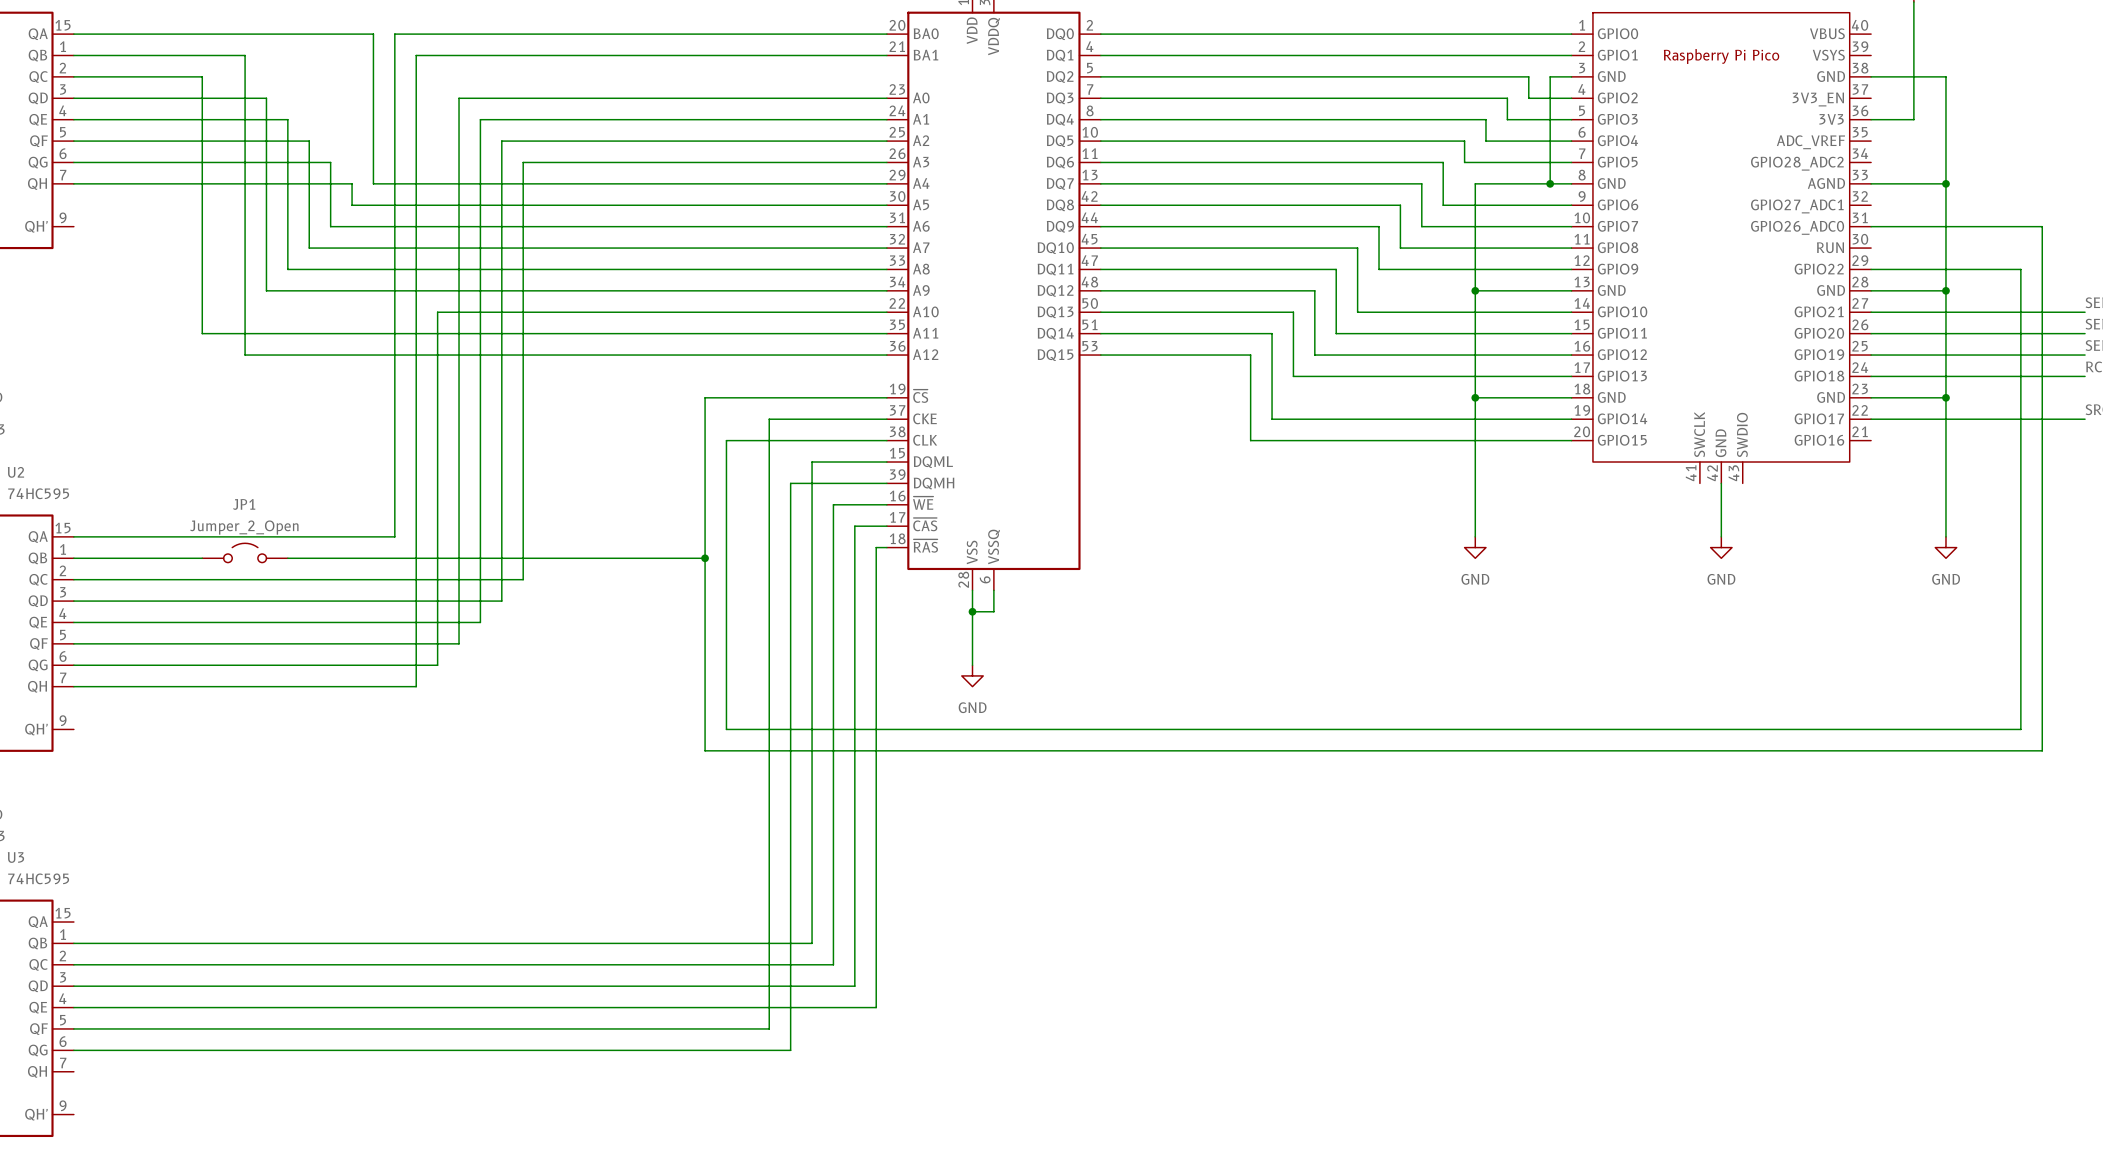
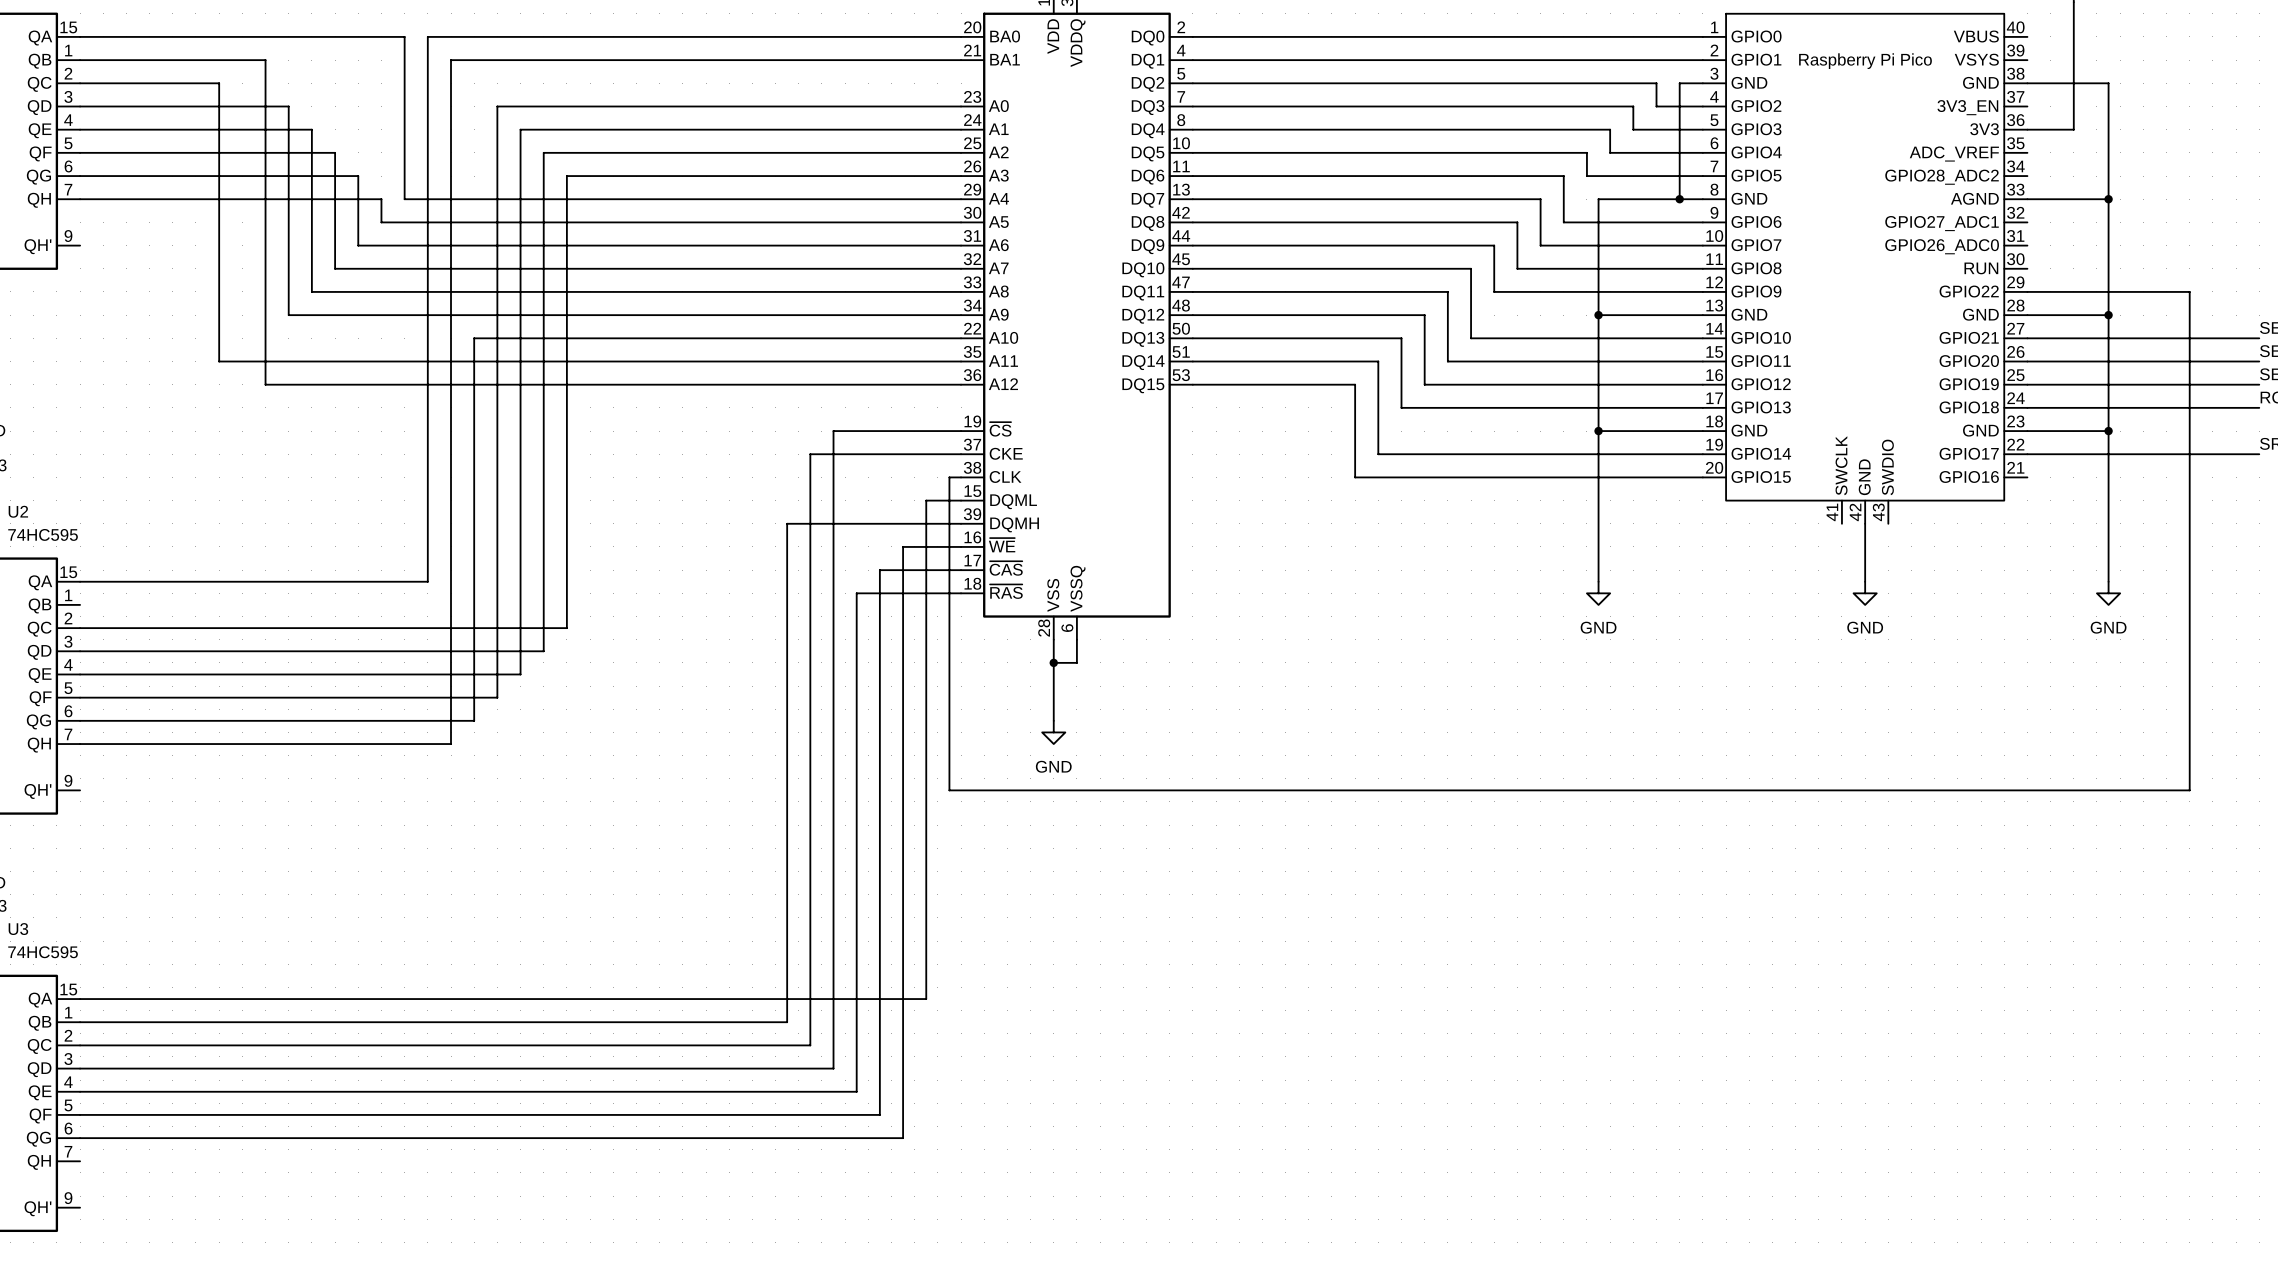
wire: (1871, 226) (2042, 226) (2042, 750) (705, 750) (705, 397) (769, 397) -> (810, 1045) (810, 454) (833, 454) (833, 431)
wire: (876, 440) (726, 440) (726, 483) -> (949, 477) (949, 593) (856, 593)
wire: (854, 462) (812, 462) (812, 526) -> (926, 500) (926, 570) (879, 570)
wire: (790, 483) (790, 547) -> (856, 523) (787, 523)
JP1: Jumper_2_Open (245, 552) -> none
wire: (73, 558) (202, 558) -> none
wire: (287, 558) (705, 558) -> none
junction: (705, 558) -> none
wire: (726, 729) (876, 729) (876, 1007) (790, 1007) (790, 1050) -> (787, 790) (787, 1022)
wire: none -> (80, 999) (926, 999)
wire: (854, 922) (854, 986) (769, 986) (769, 1028) -> (879, 1022) (879, 1114) (833, 1114)
wire: (726, 943) (812, 943) -> none
wire: (747, 964) (833, 964) -> (856, 1138) (903, 1138) (903, 1045)

